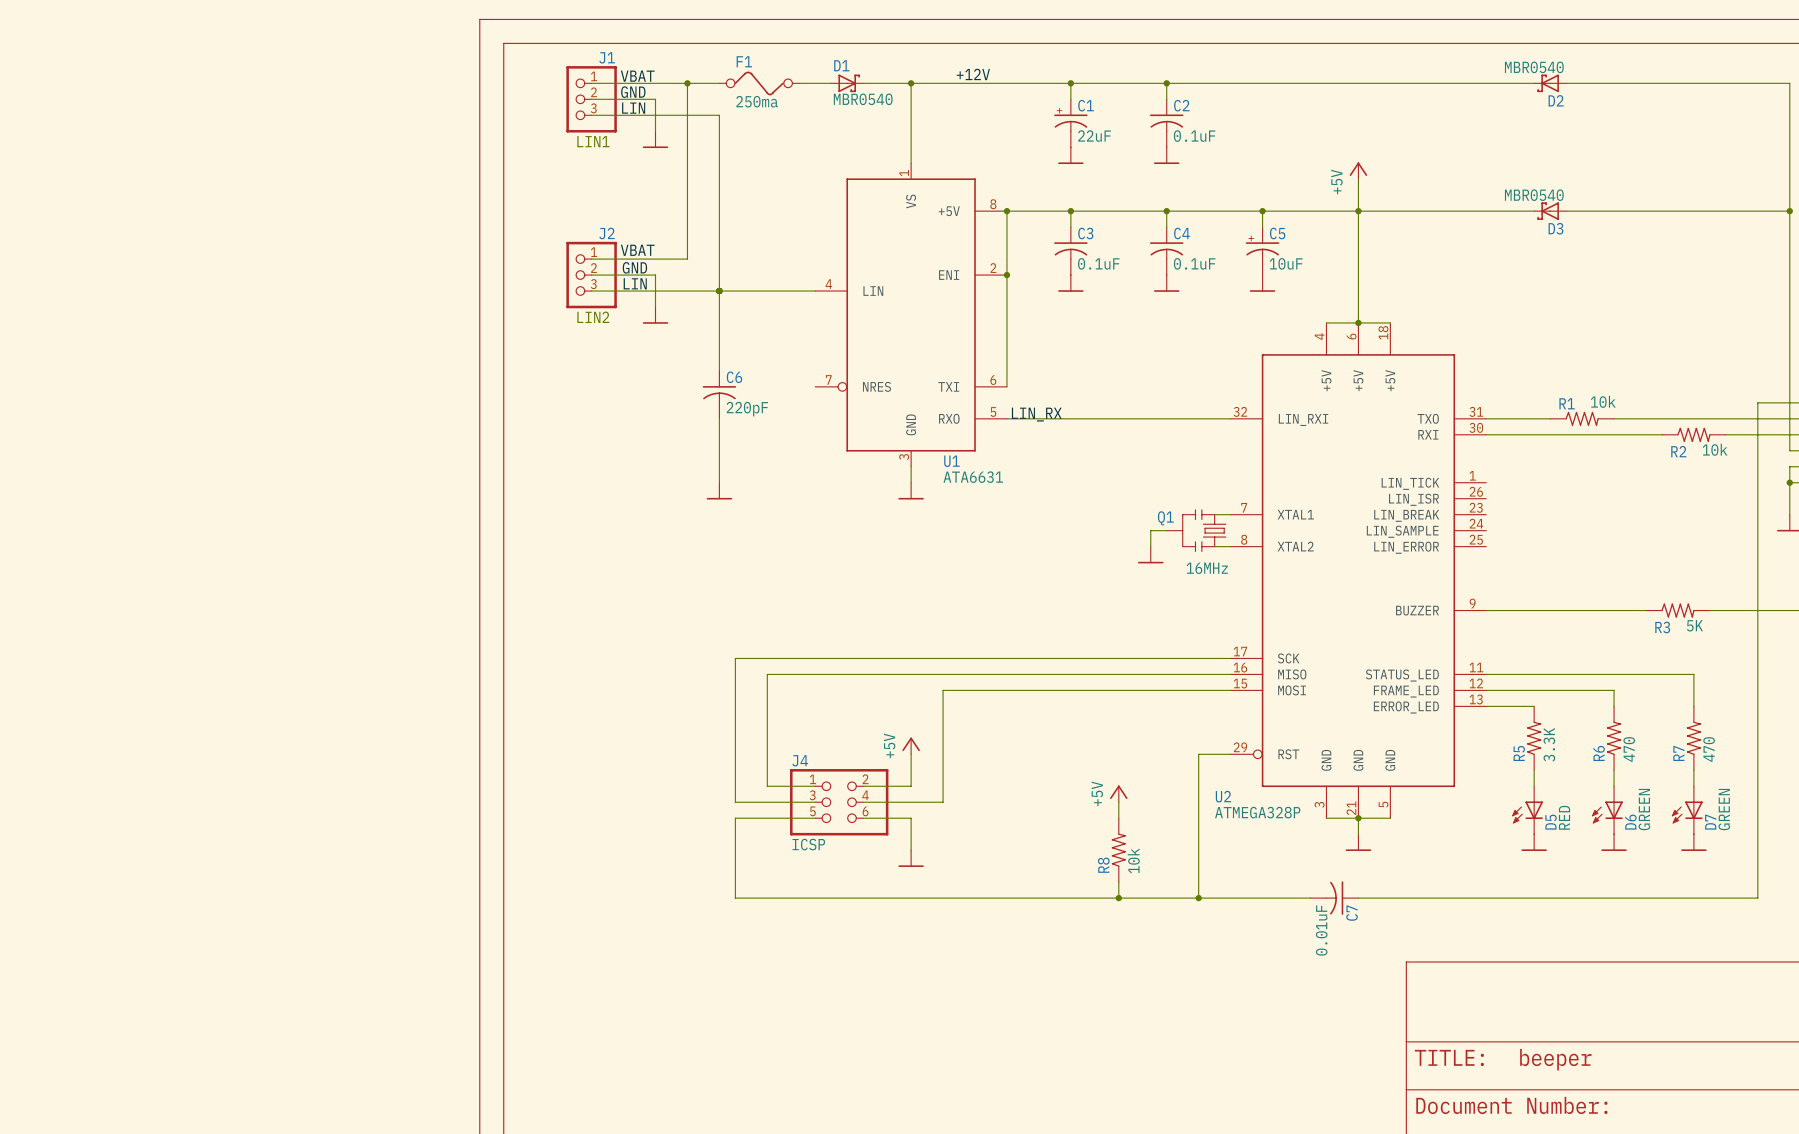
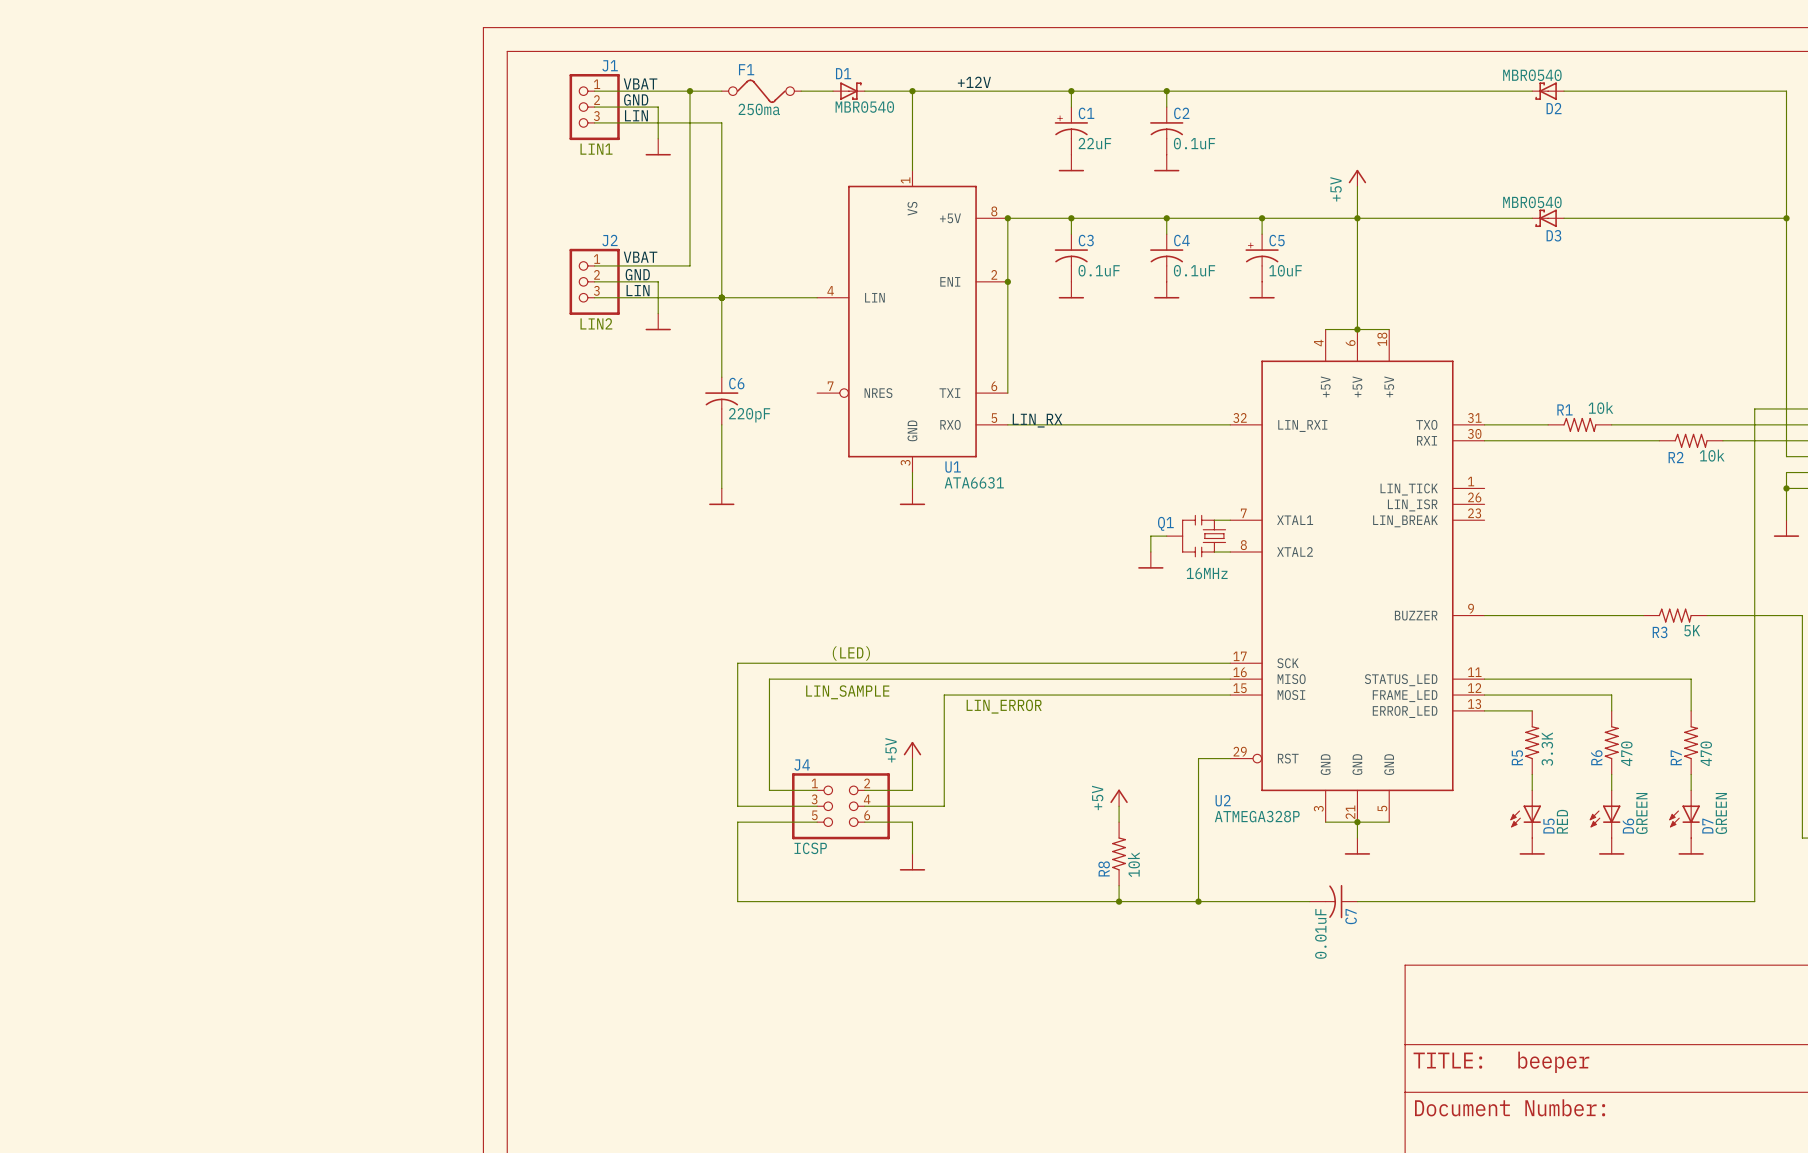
U2 symbol: [1230, 322, 1487, 819] -> [1230, 329, 1485, 823]
text: none -> (LED) (851, 653)
text: none -> LIN_SAMPLE (847, 692)
text: none -> LIN_ERROR (1004, 706)

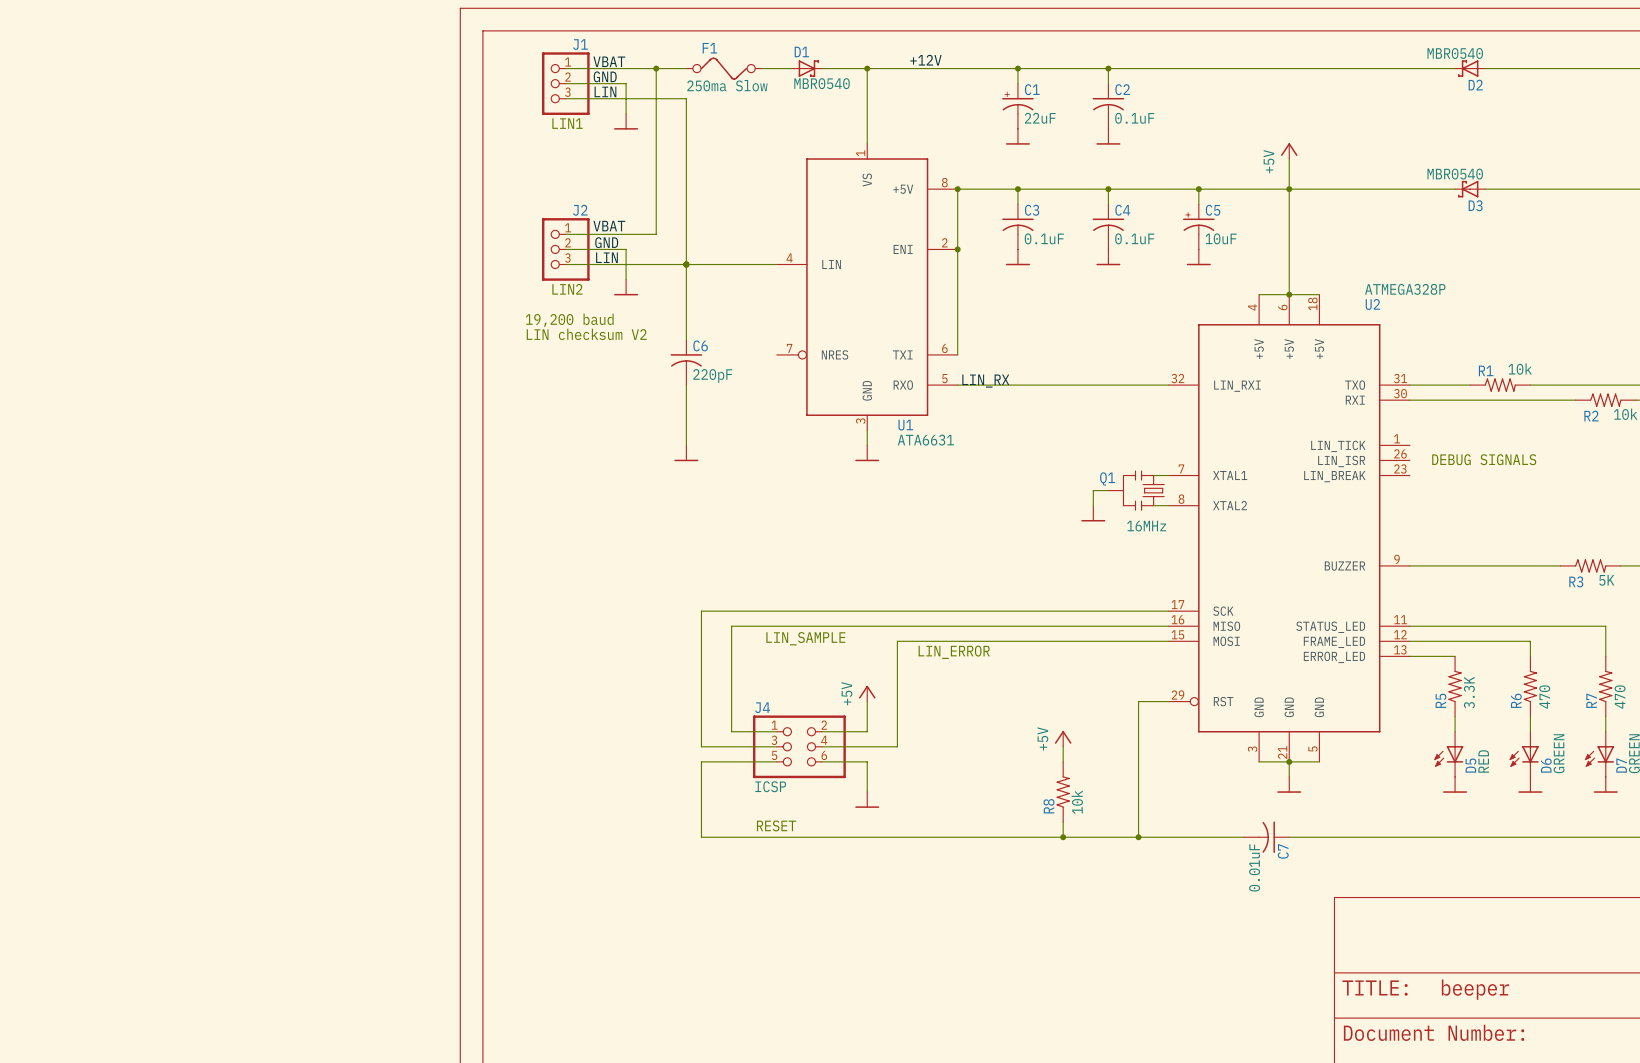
F1 value: 250ma (759, 109) -> 250ma Slow (727, 85)
text: none -> 19,200 baud (569, 320)
text: none -> LIN checksum V2 (586, 334)
text: none -> DEBUG SIGNALS (1484, 459)
text: (LED) (851, 653) -> none
U2 name position: U2 (1223, 800) -> U2 (1372, 304)
U2 value position: ATMEGA328P (1257, 816) -> ATMEGA328P (1405, 289)
text: none -> RESET (776, 825)

